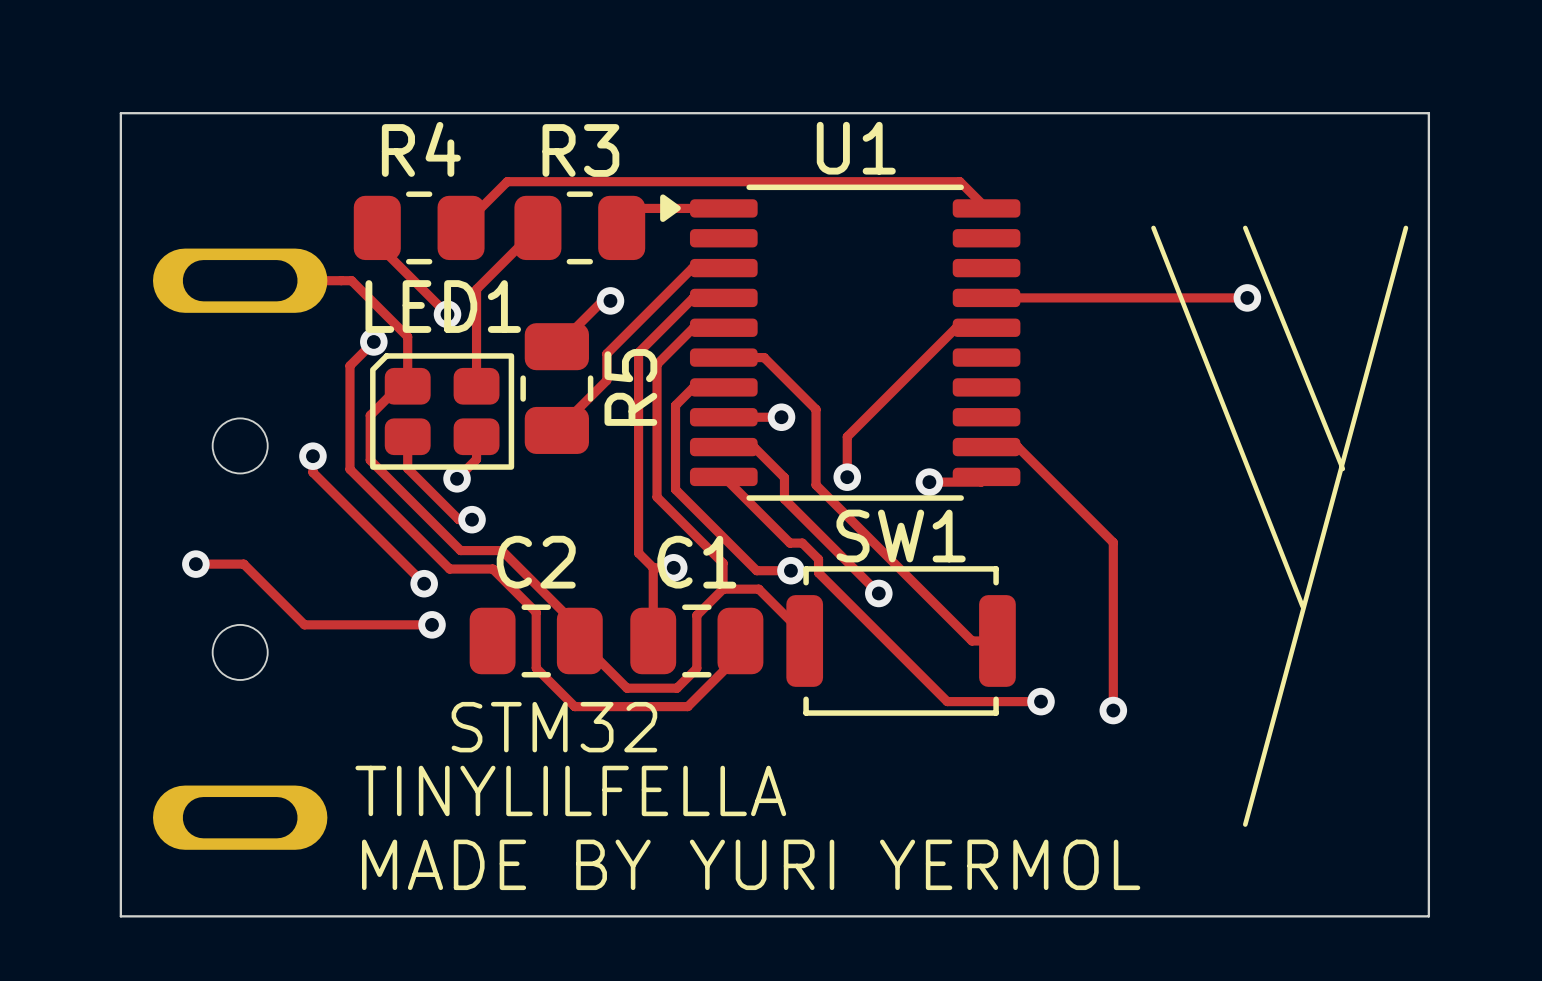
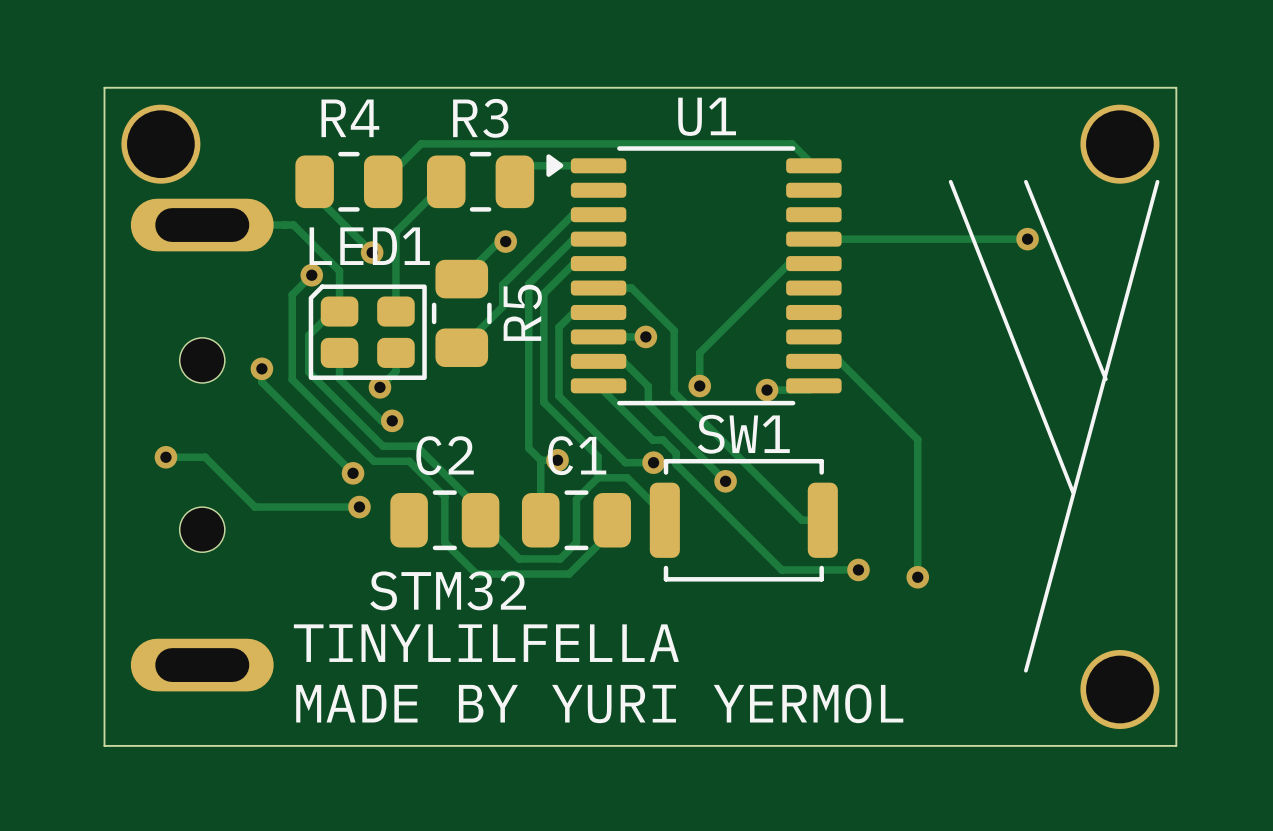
part: none -> (160, 144)
part: none -> (1119, 144)
part: none -> (1119, 689)

